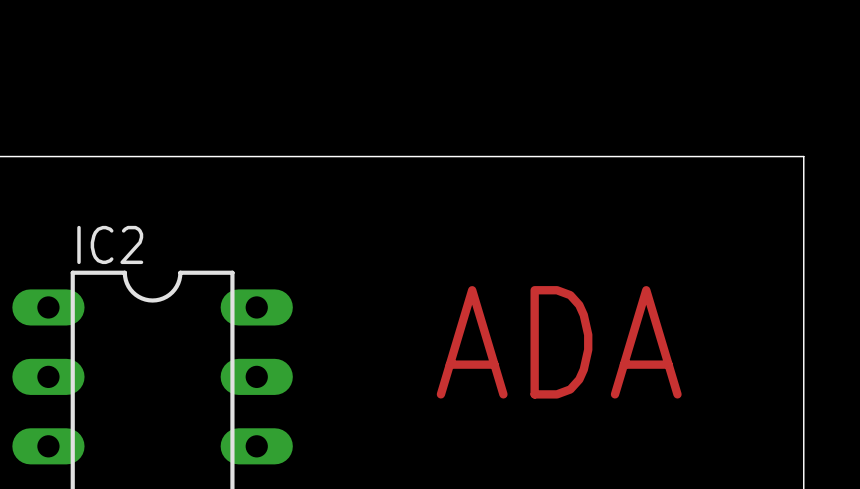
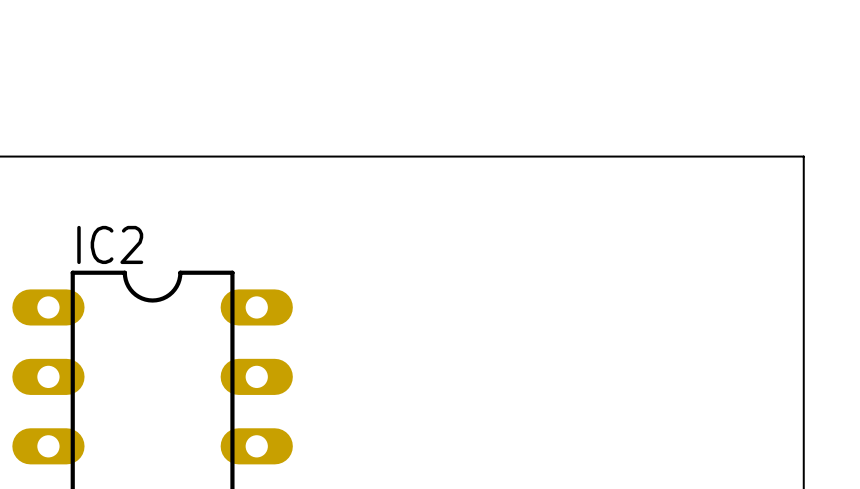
text: ADA (559, 342) -> none

